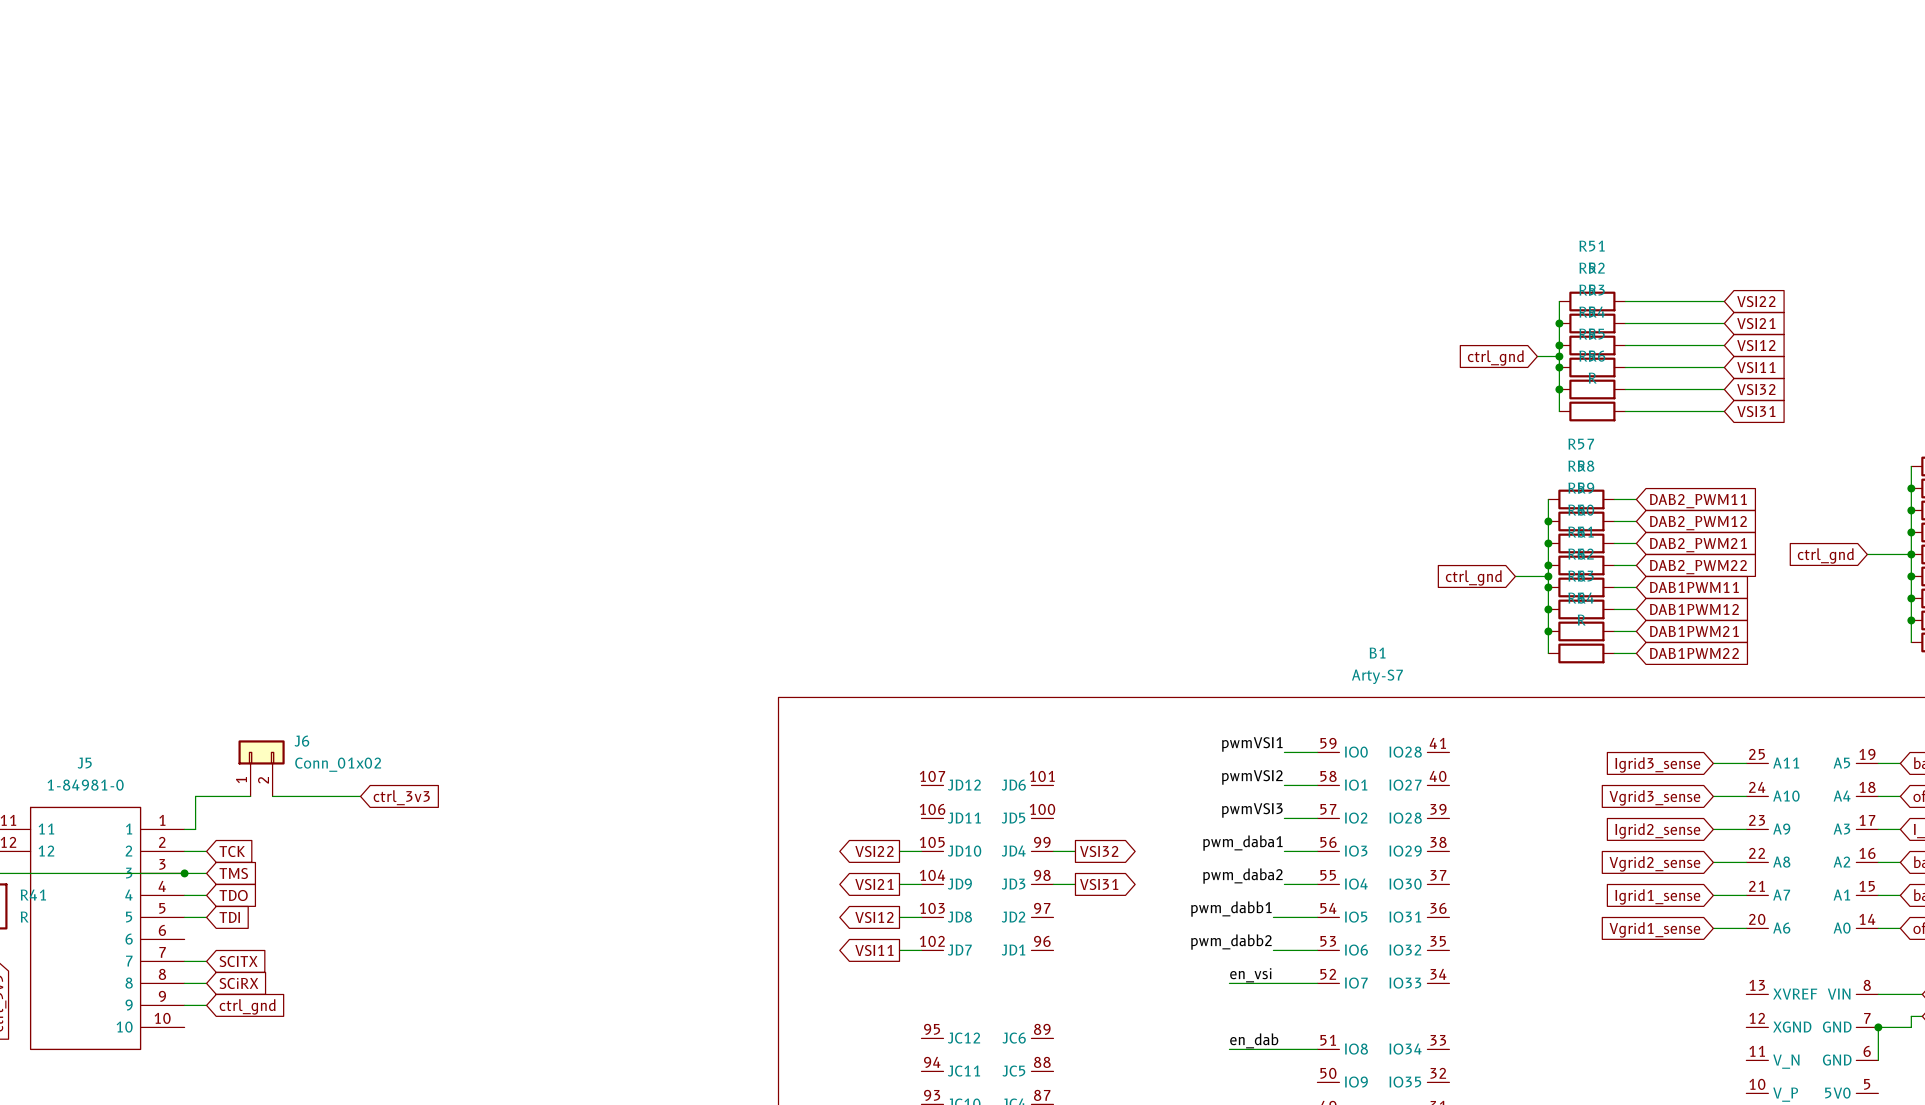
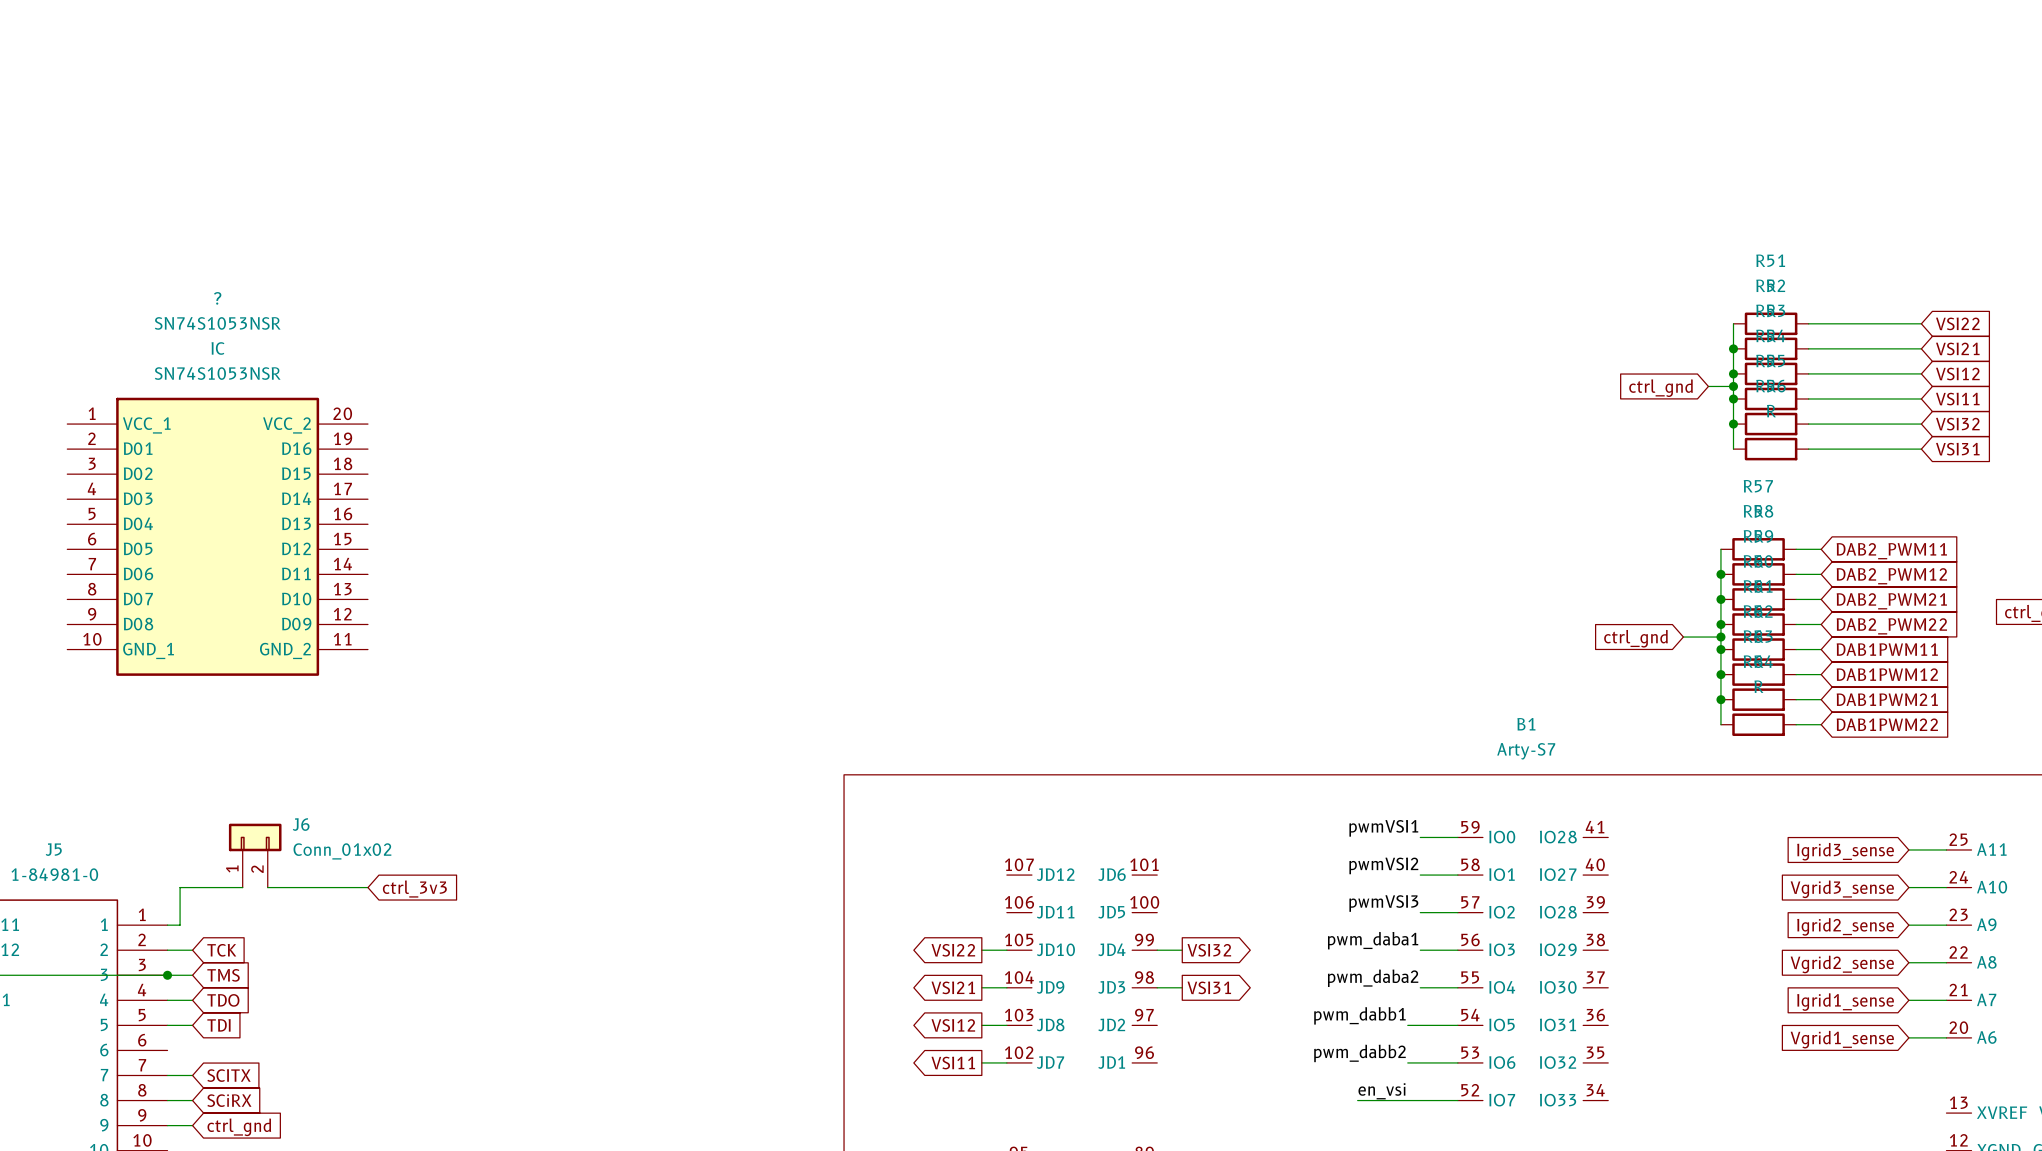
part: none -> SN74S1053NSR (217, 536)

